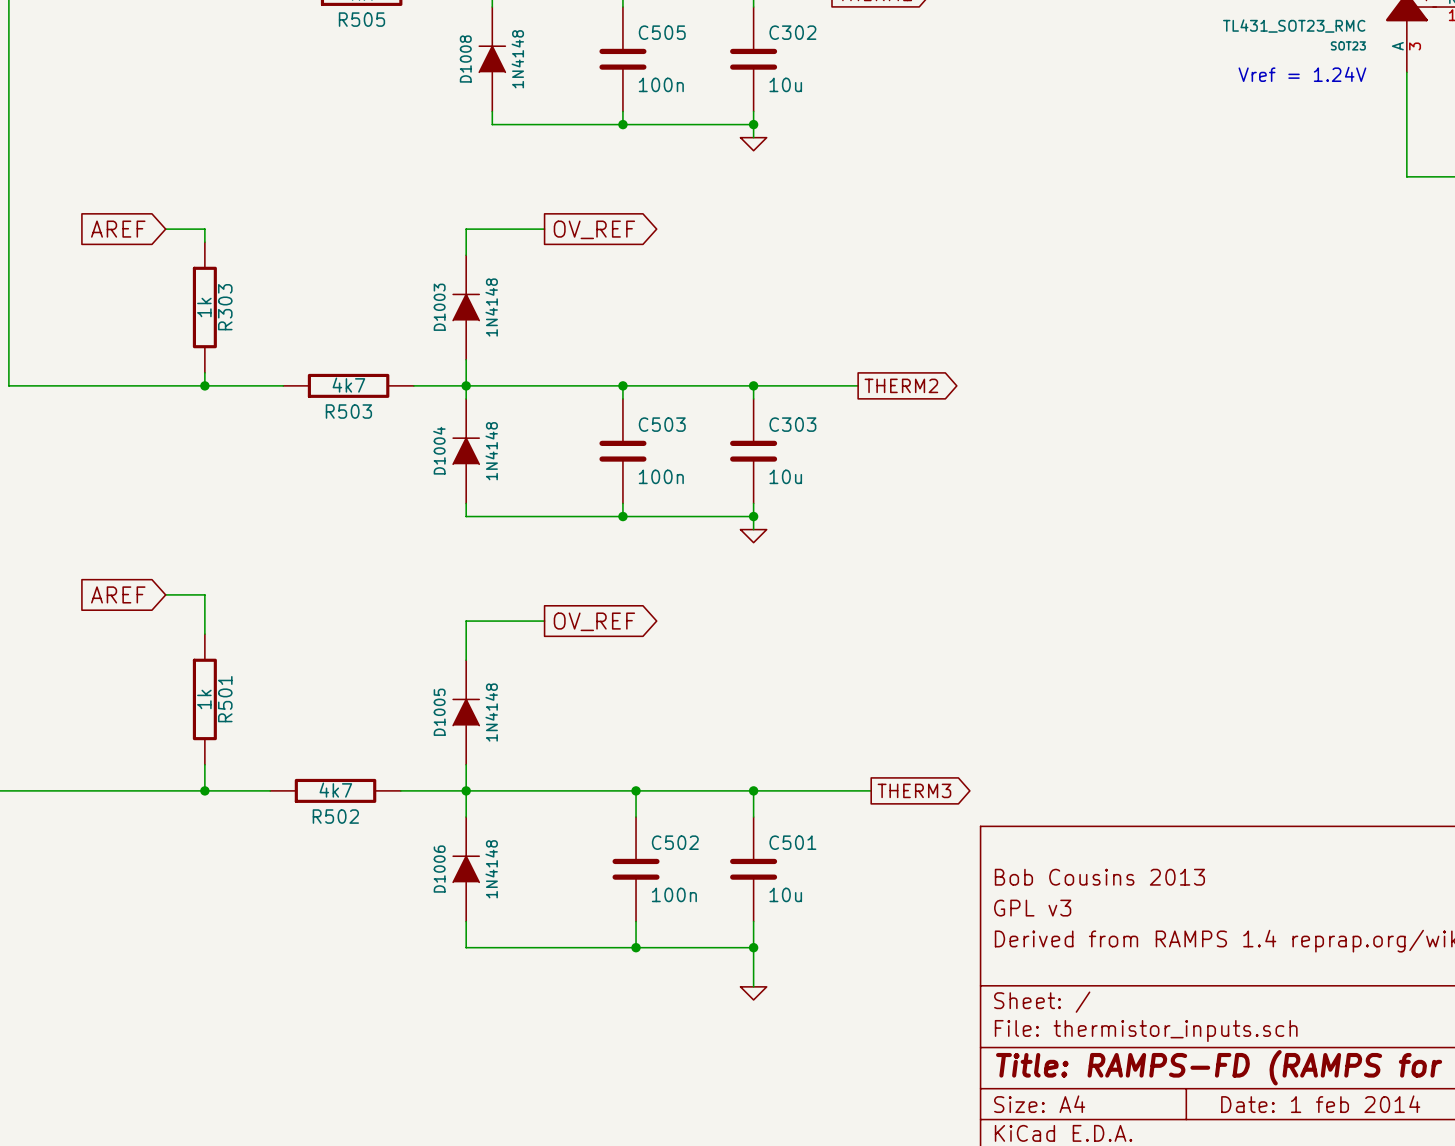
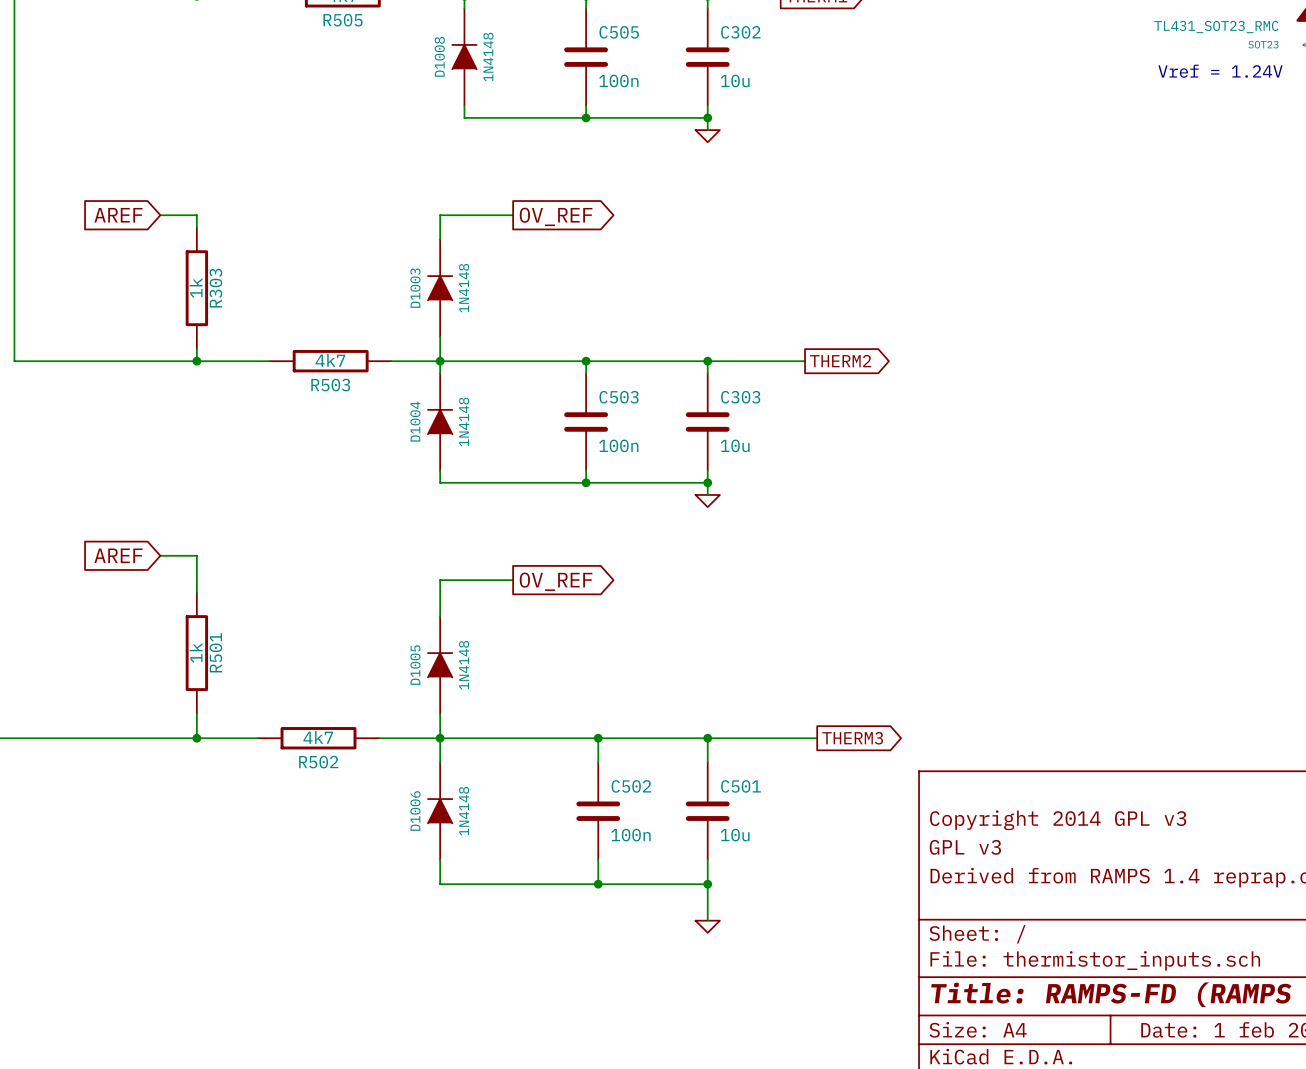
title block: Bob Cousins 2013 (1099, 877) -> Copyright 2014 GPL v3 (1058, 820)

